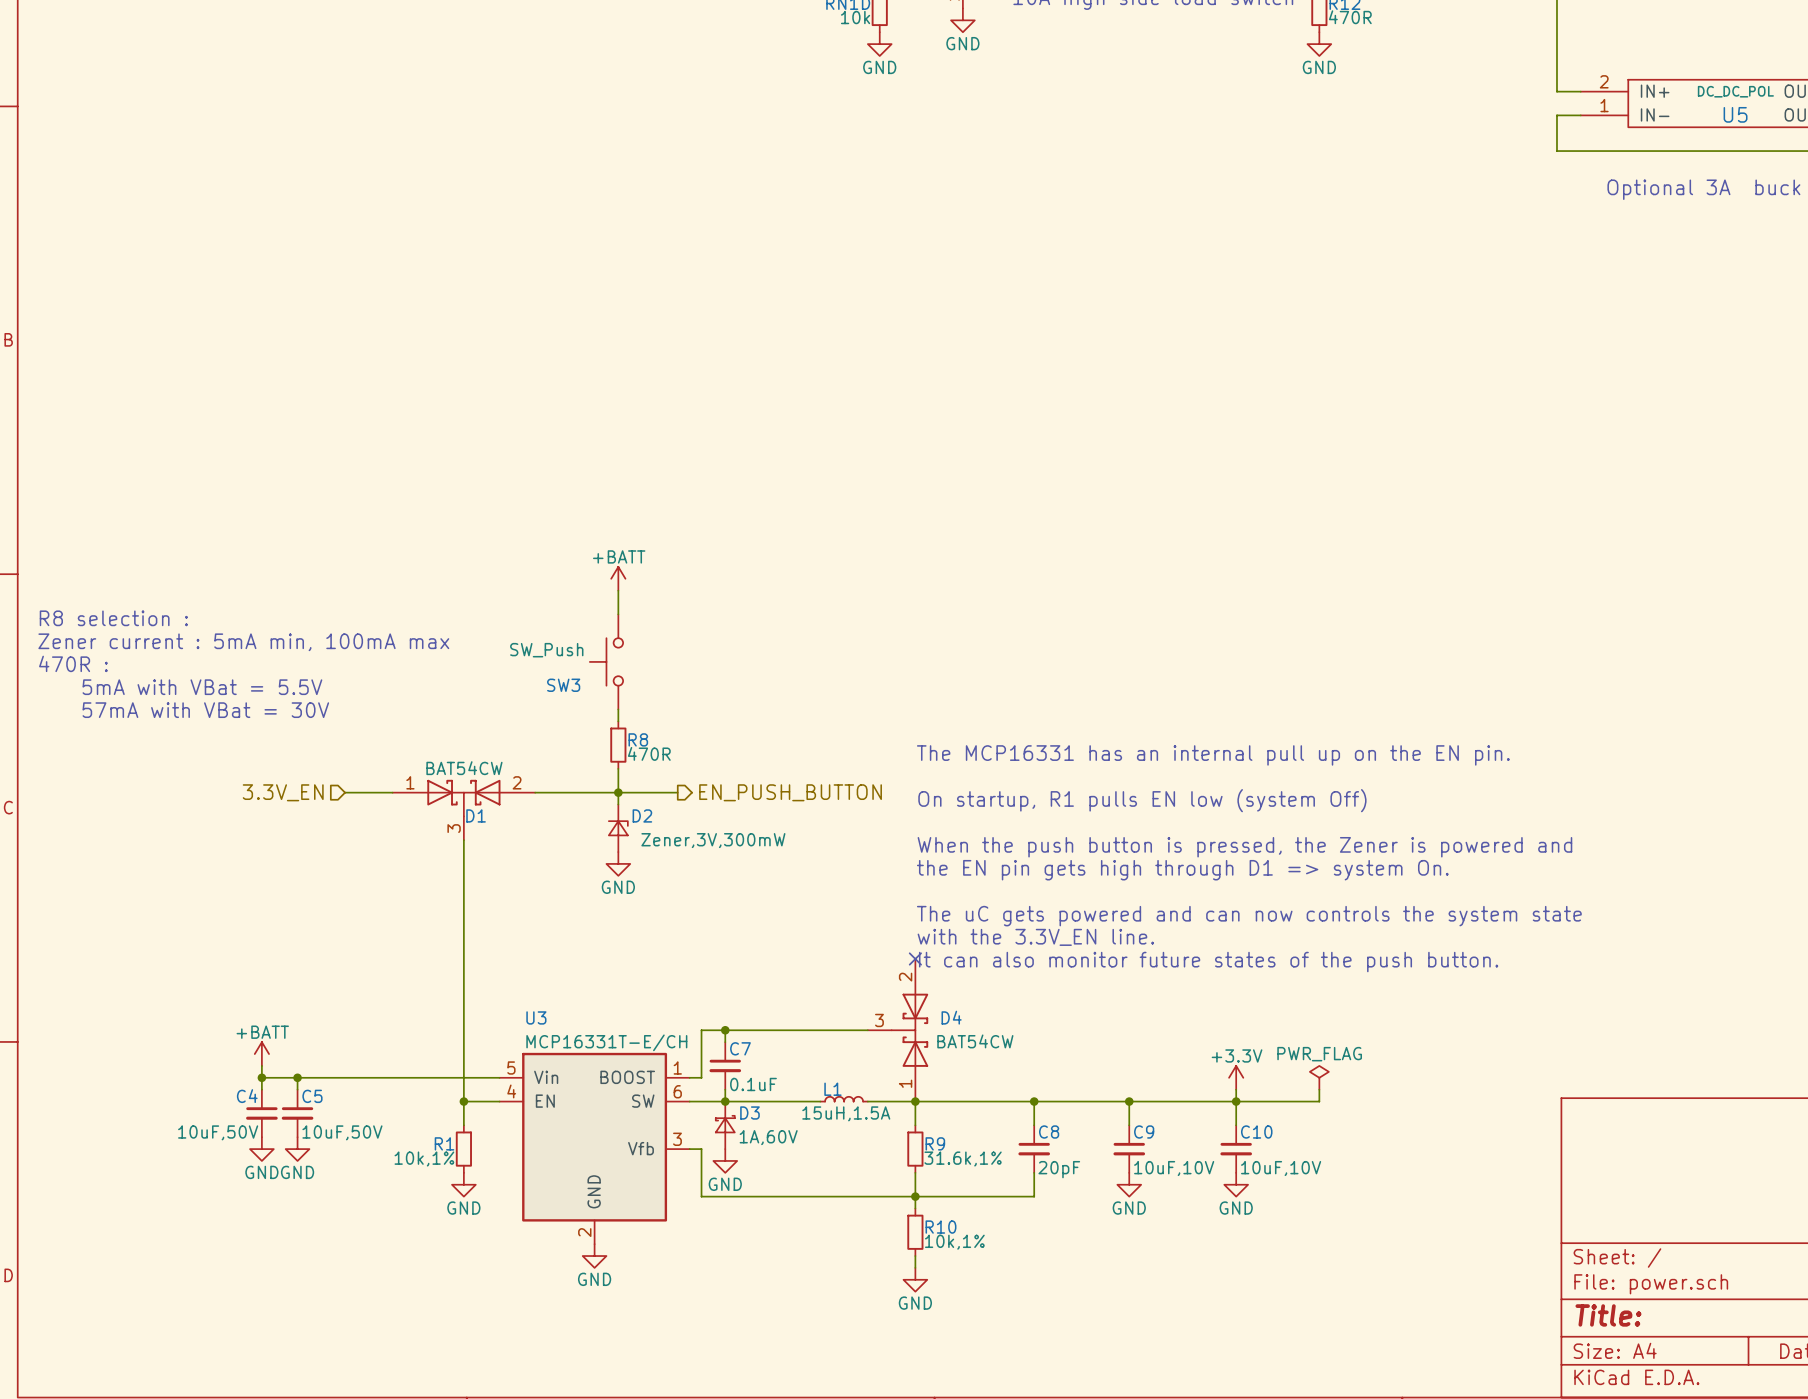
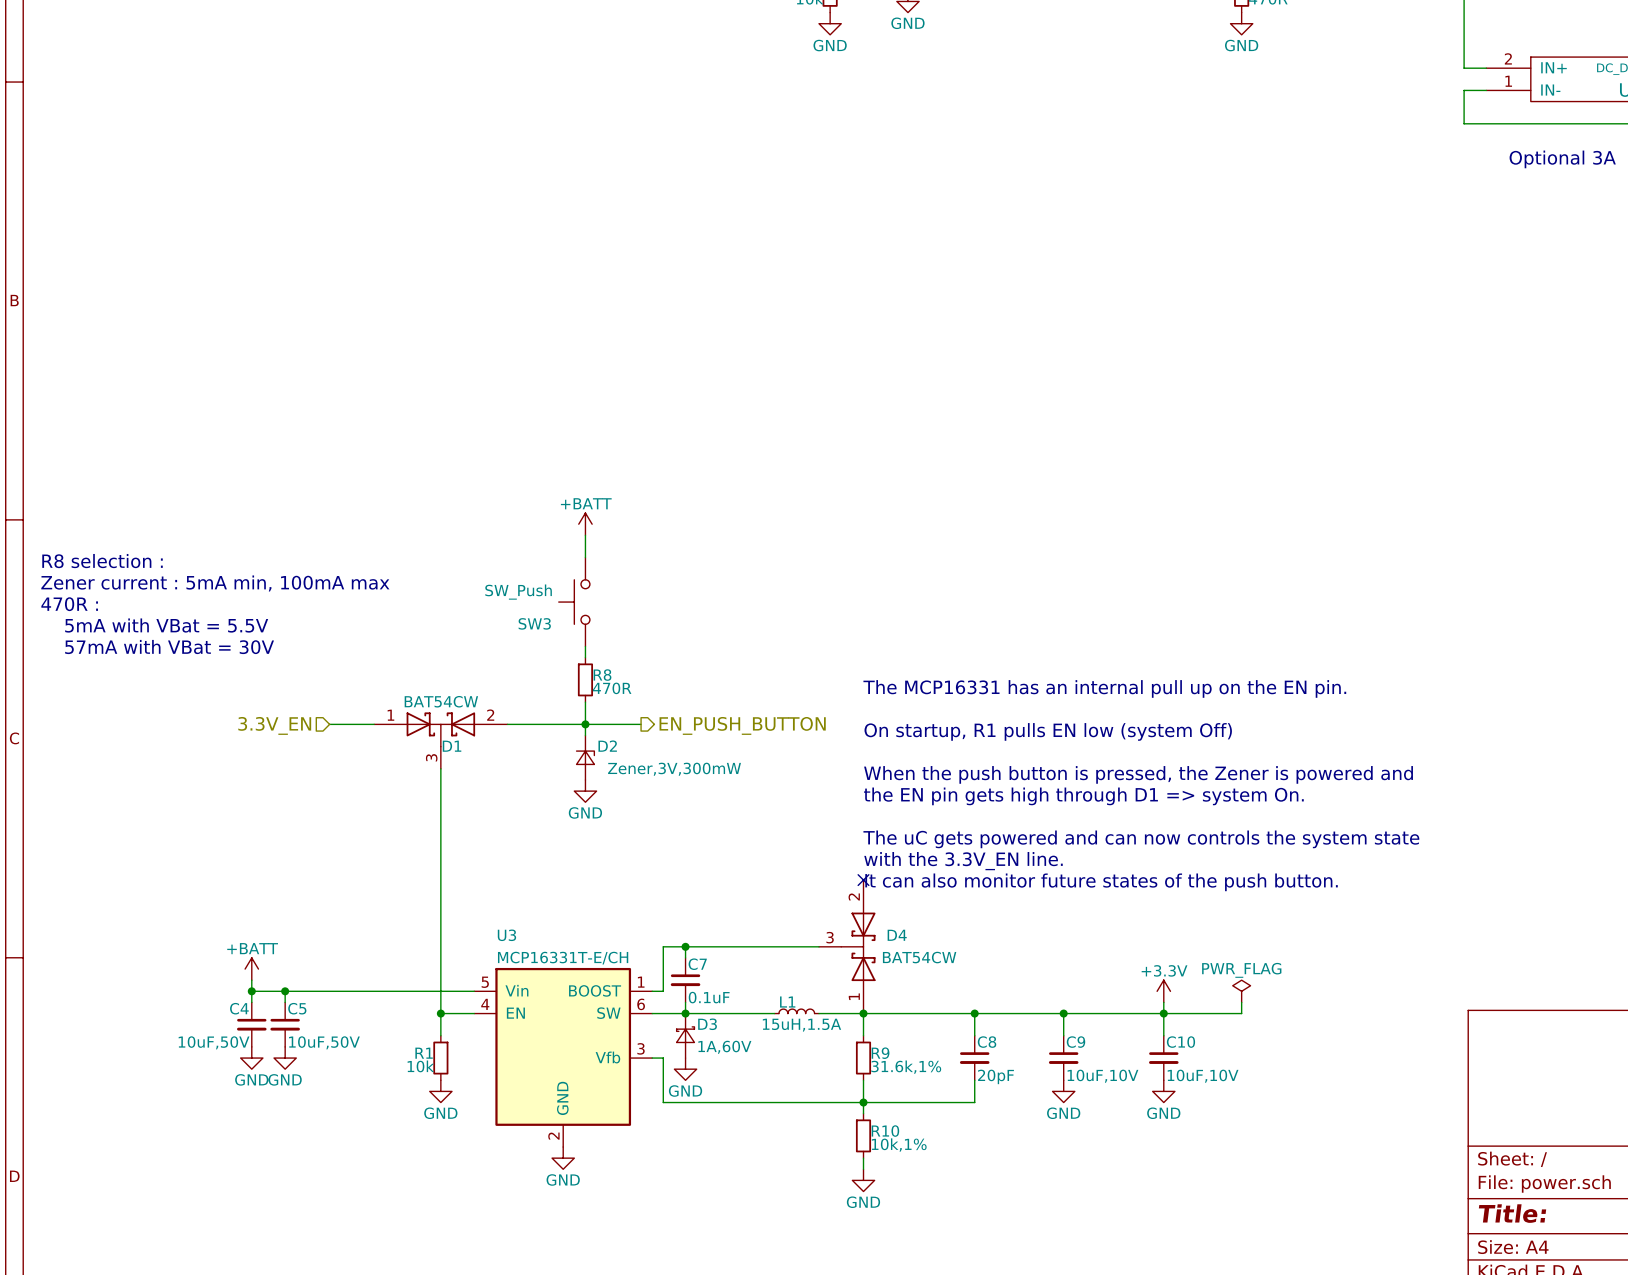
R1 value: 10k,1% (424, 1159) -> 10k (420, 1066)

